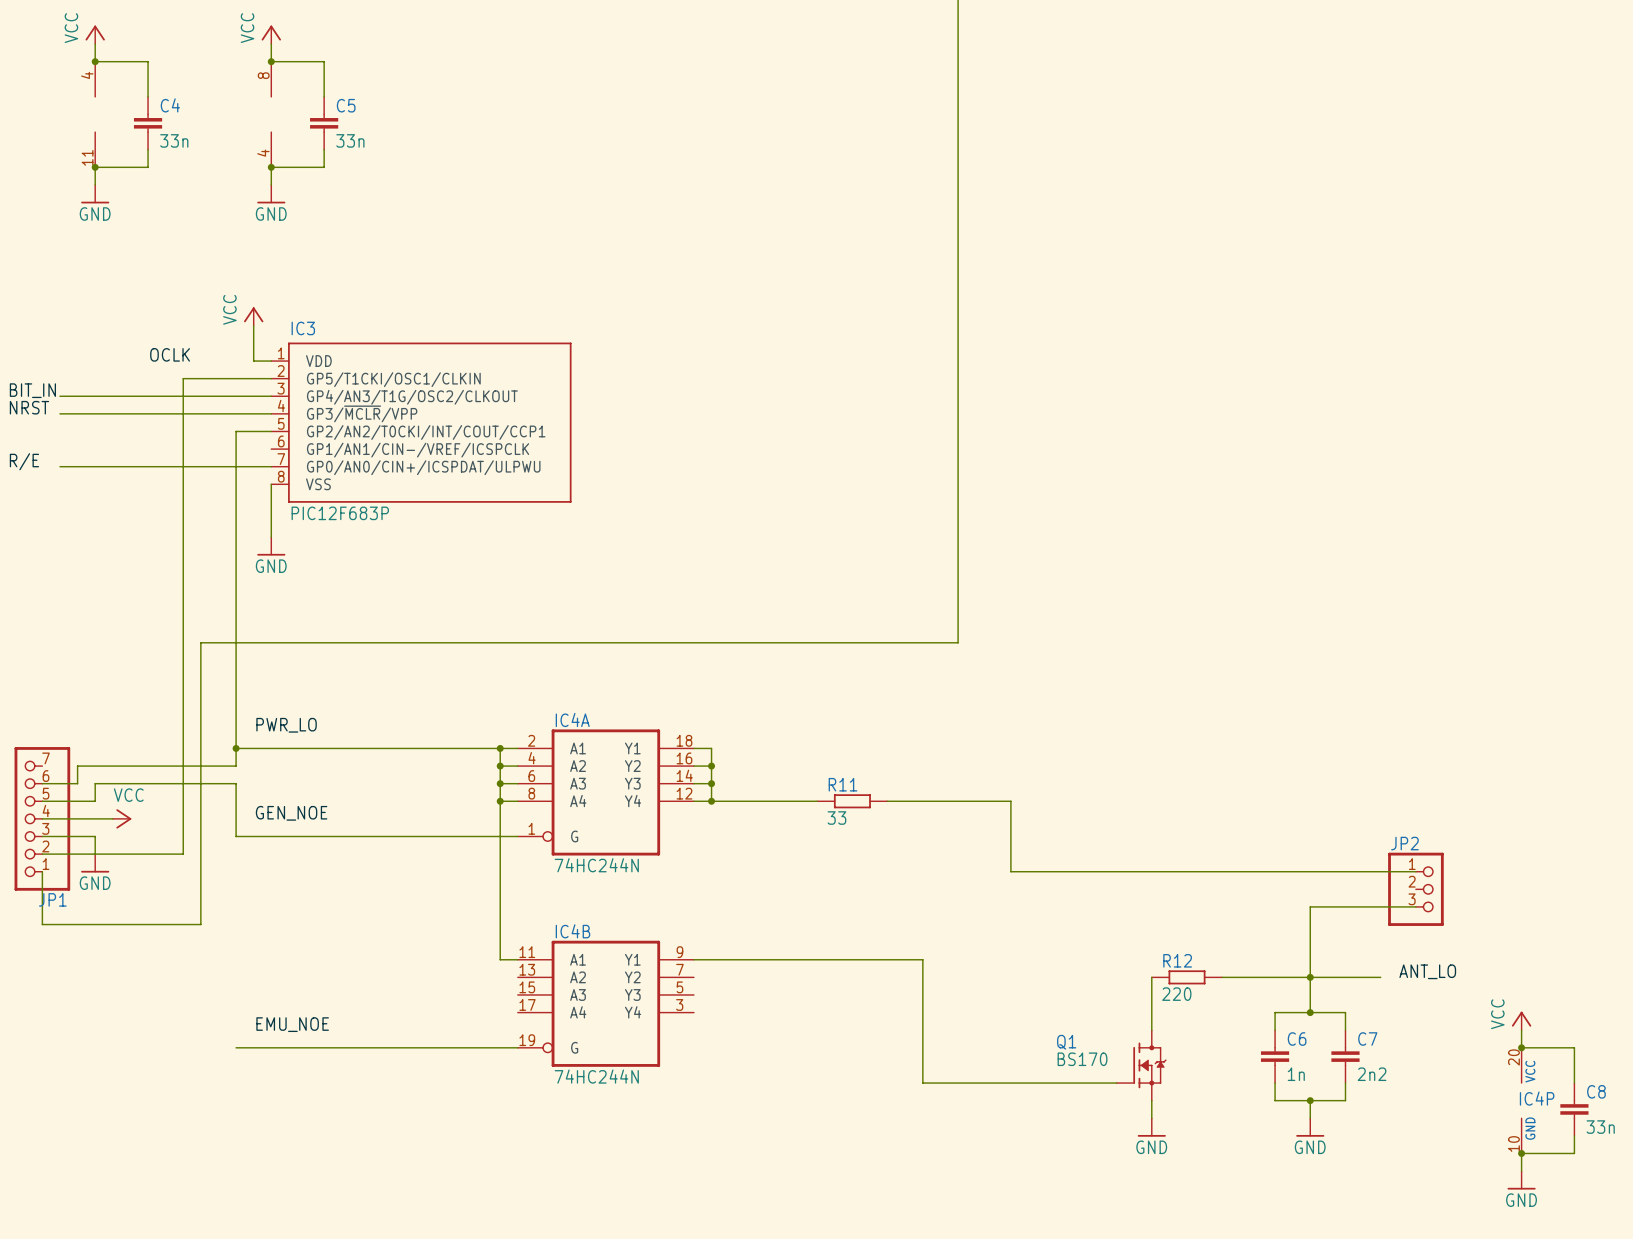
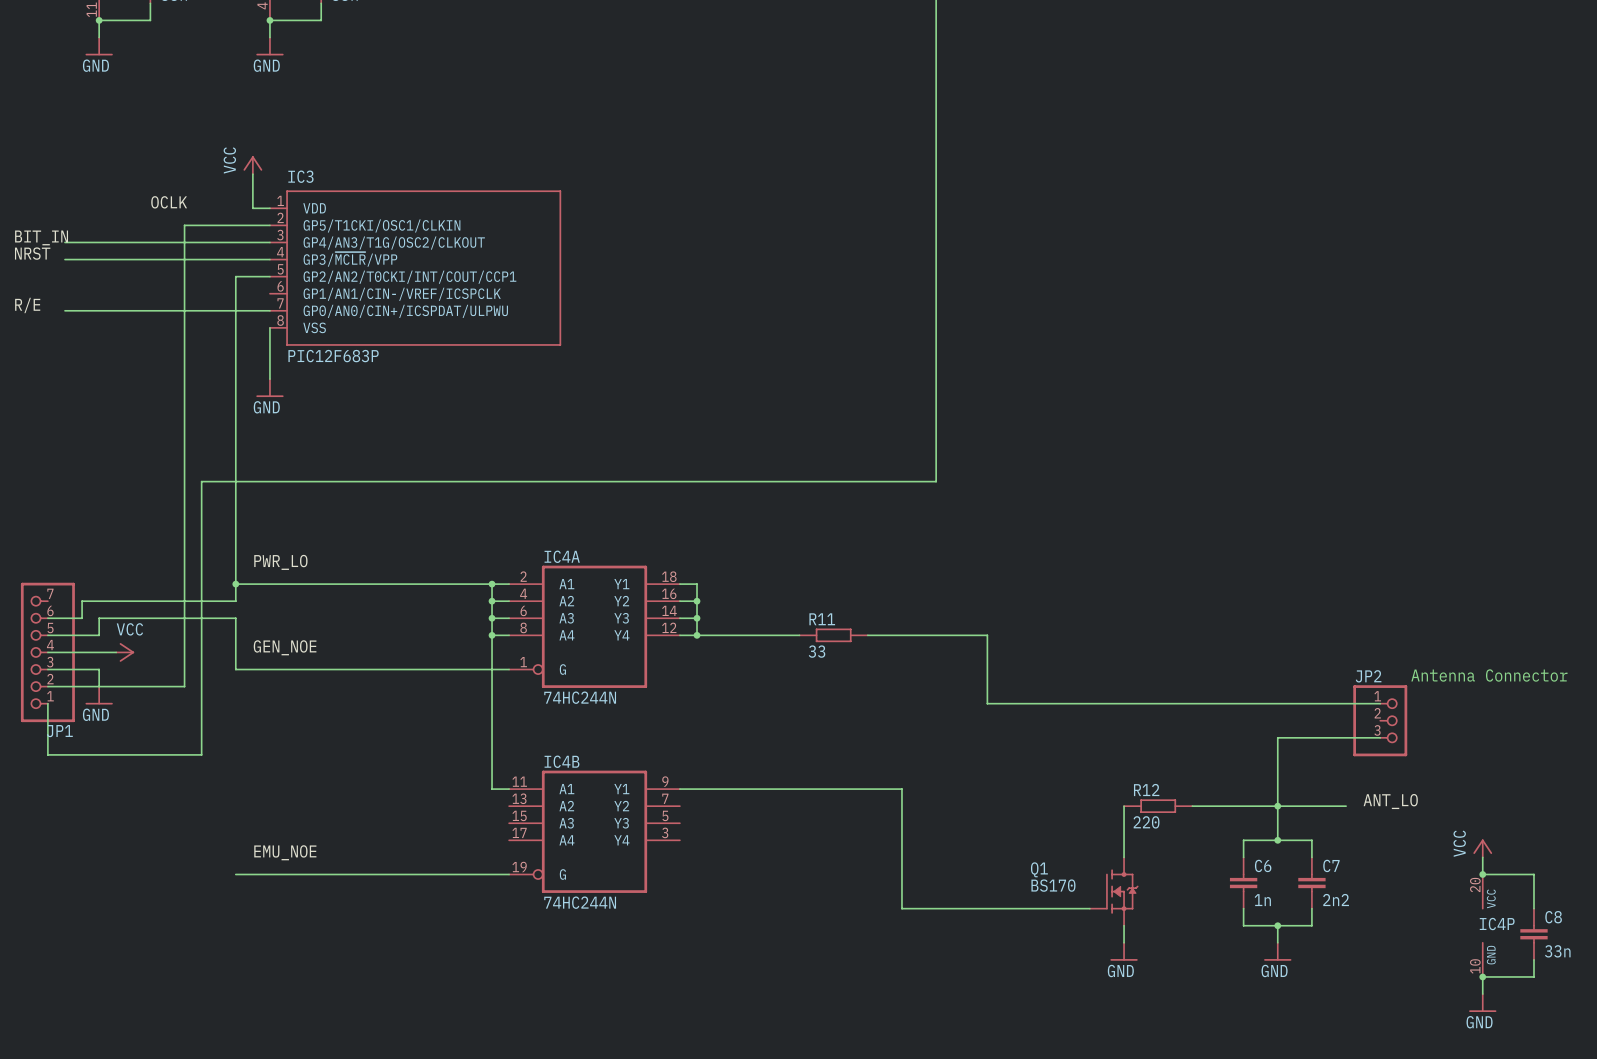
text: none -> Antenna Connector (1489, 675)

